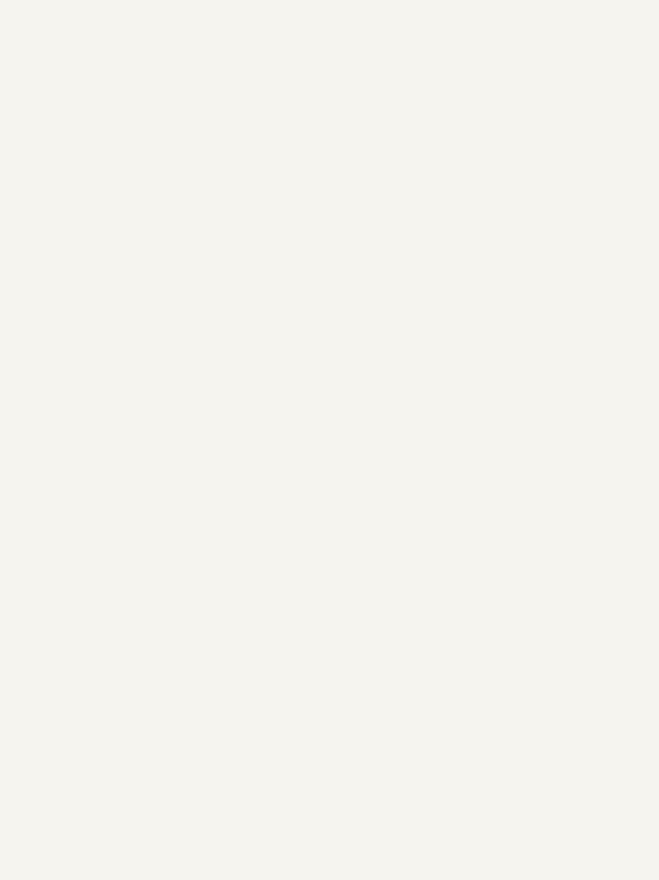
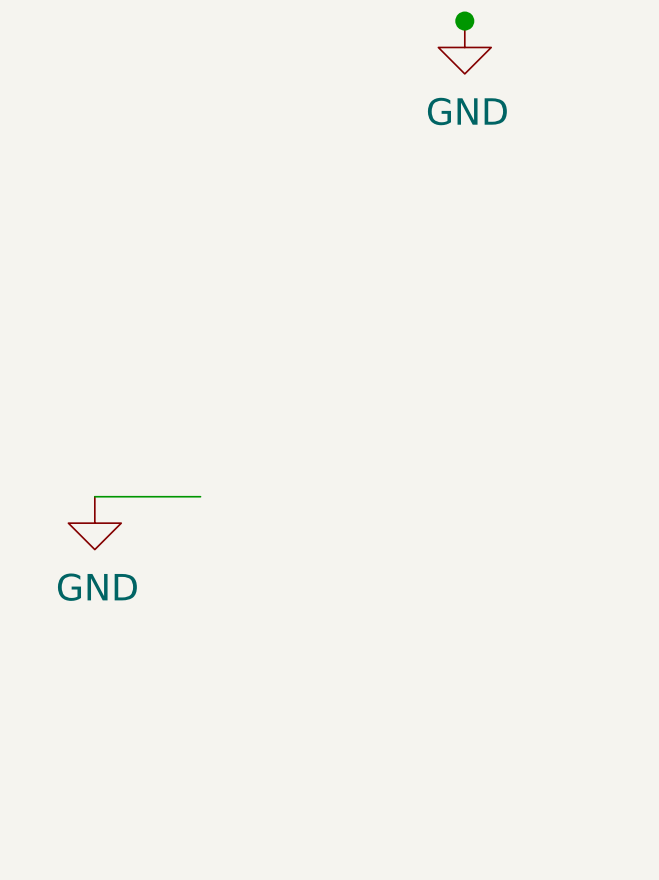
junction: none -> (464, 21)
power symbol: none -> GND (464, 47)
wire: none -> (94, 496) (200, 496)
power symbol: none -> GND (94, 523)

